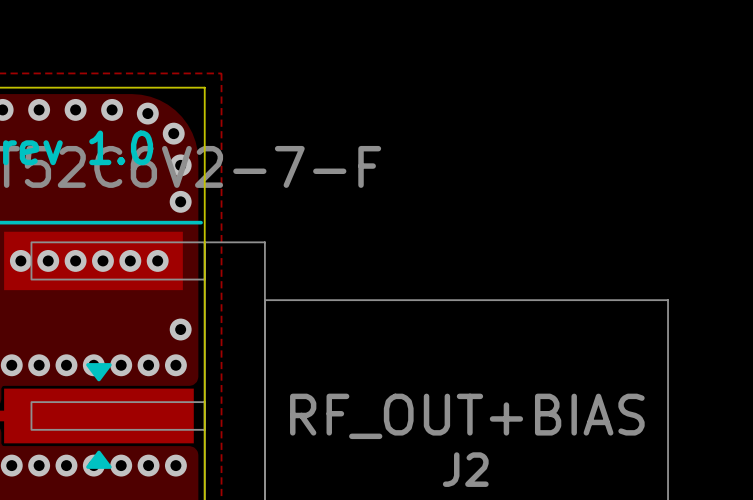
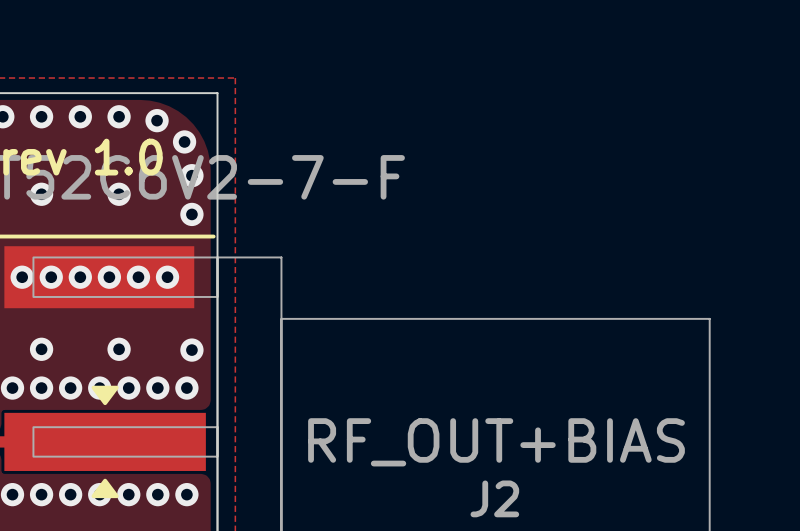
via: none -> (41, 194)
via: none -> (119, 194)
via: none -> (41, 349)
via: none -> (119, 349)

